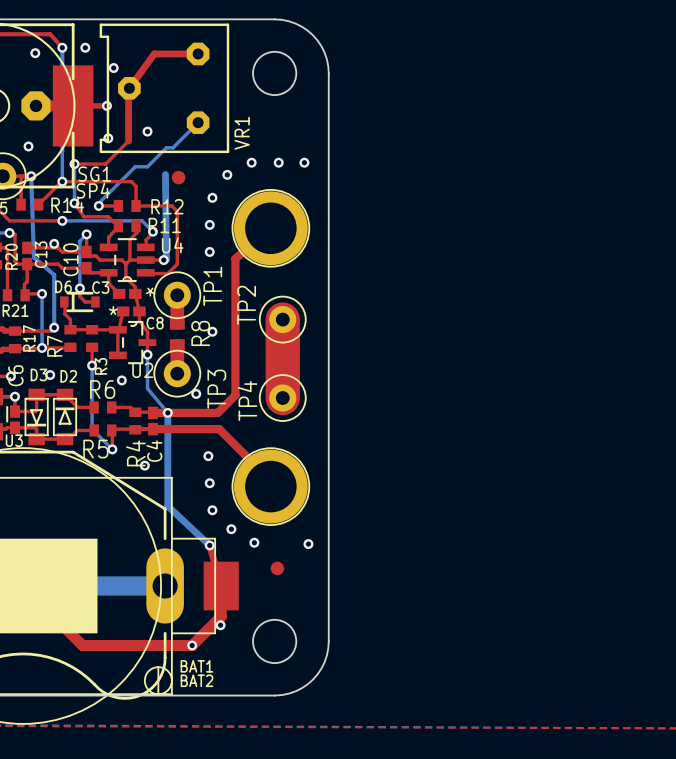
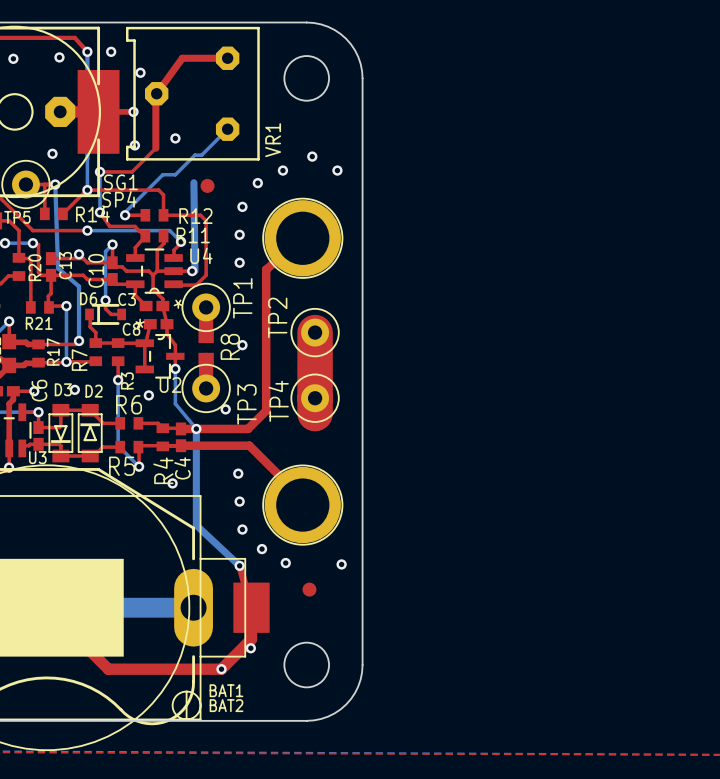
via position: (278, 162) -> (312, 156)
C8 name position: C8 (155, 323) -> C8 (131, 329)
TP4 position: (282, 398) -> (315, 398)

